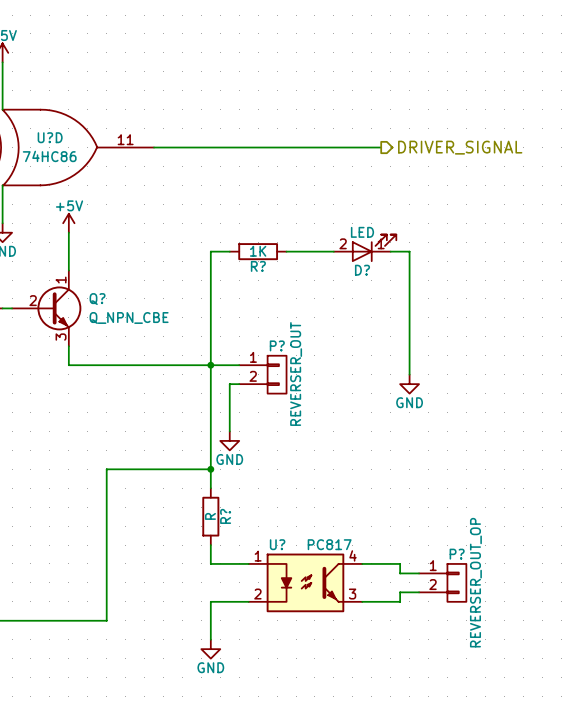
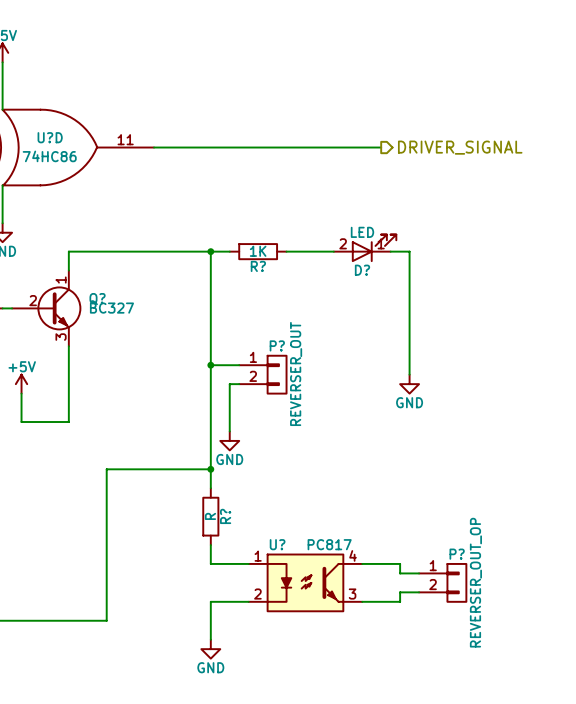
power symbol position: +5V (68, 223) -> +5V (21, 384)
wire: (68, 232) (68, 251) -> (210, 251) (68, 251)
junction: none -> (210, 251)
Q? value: Q_NPN_CBE (129, 317) -> BC327 (111, 308)
wire: (68, 365) (210, 365) -> (68, 365) (68, 422) (21, 422) (21, 393)

